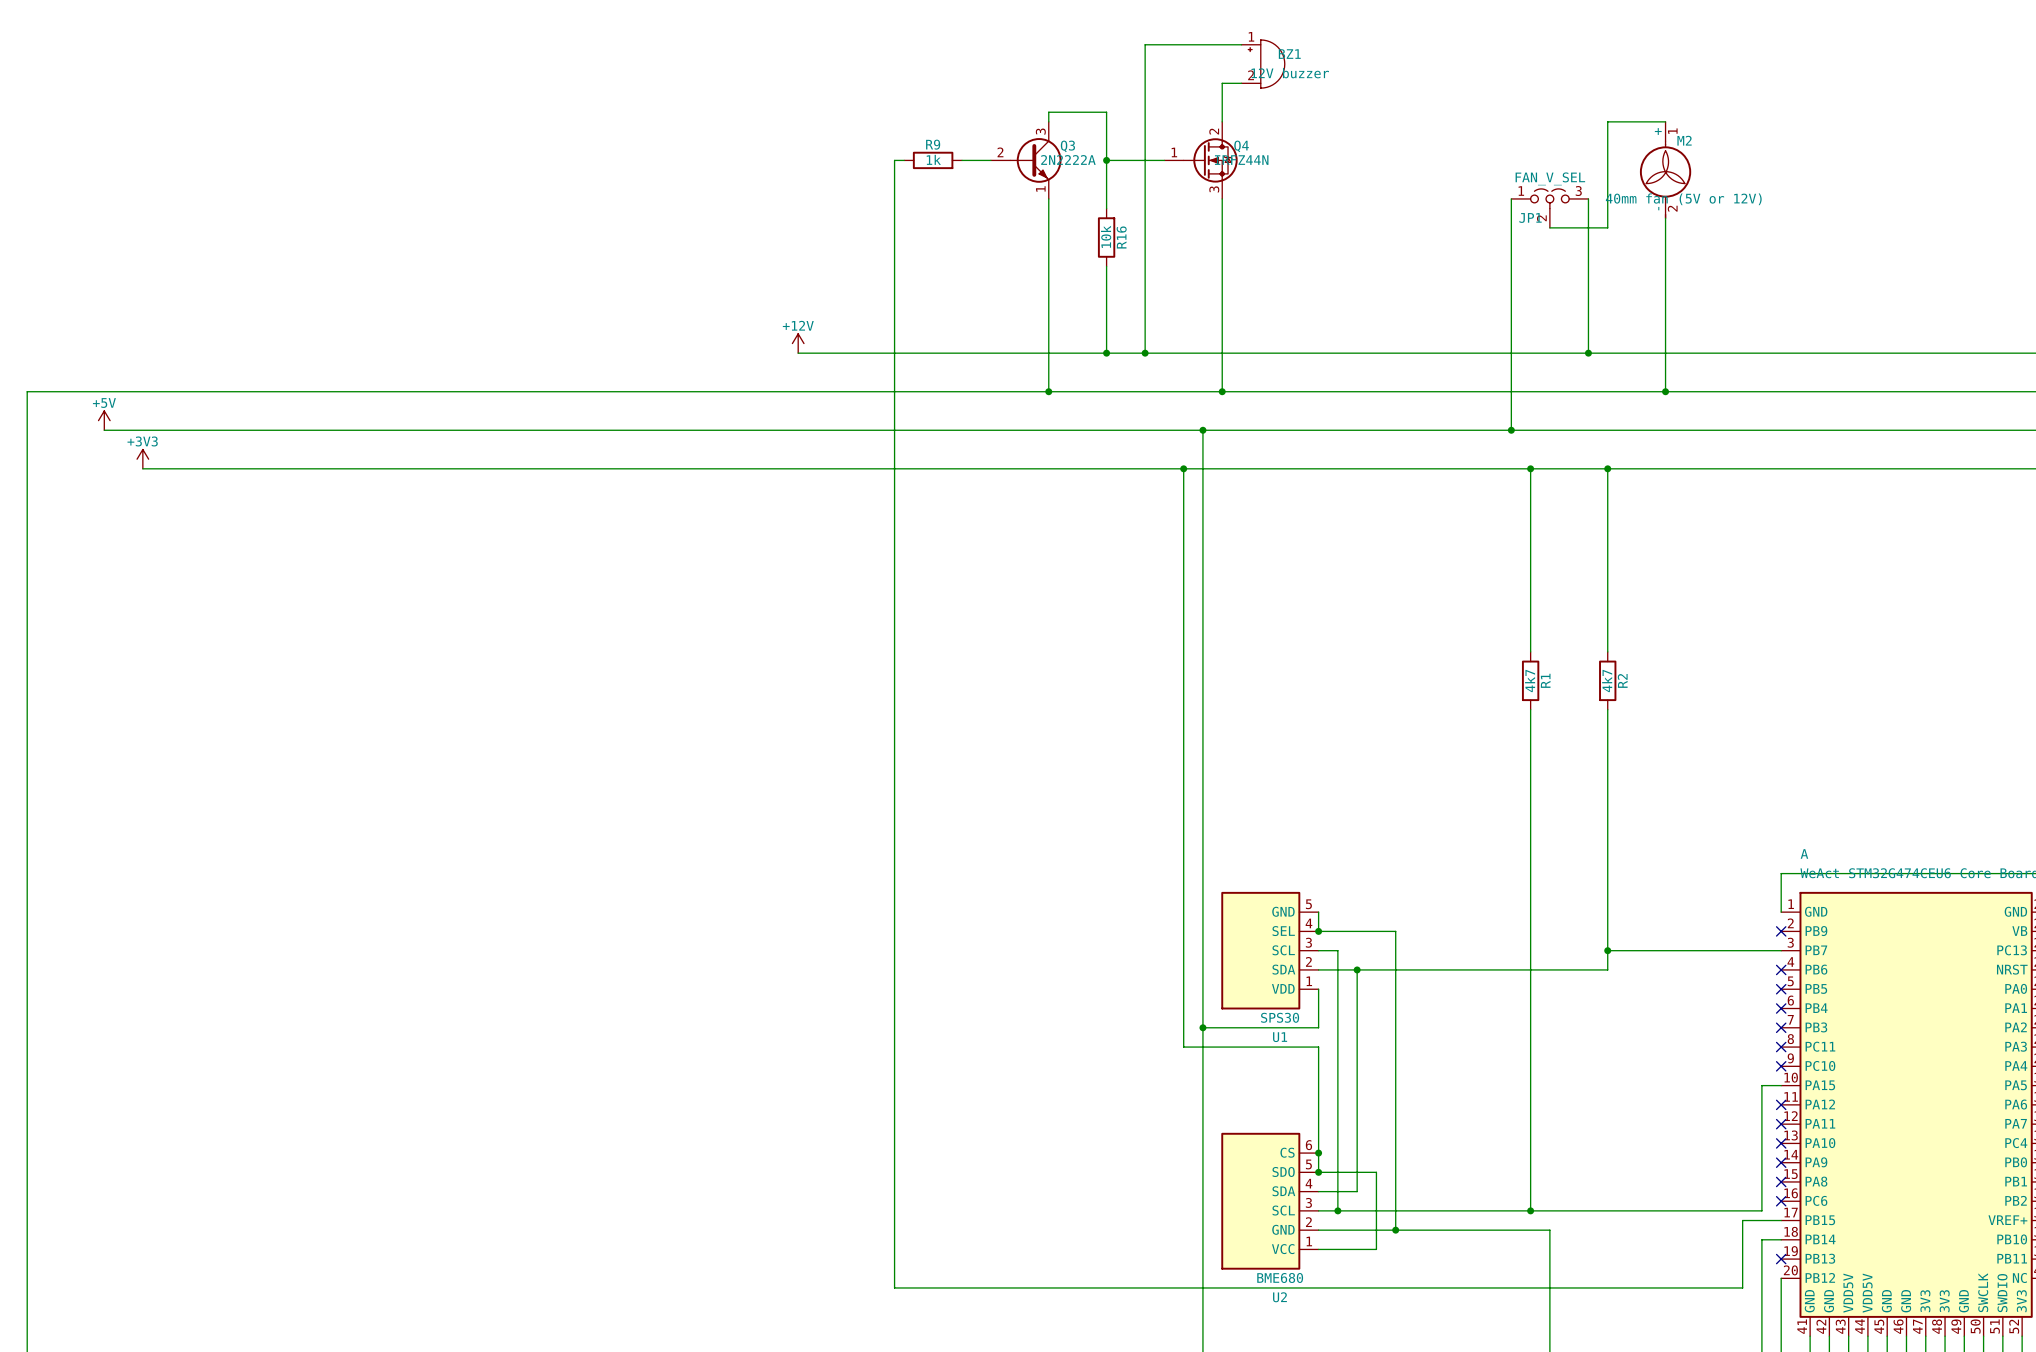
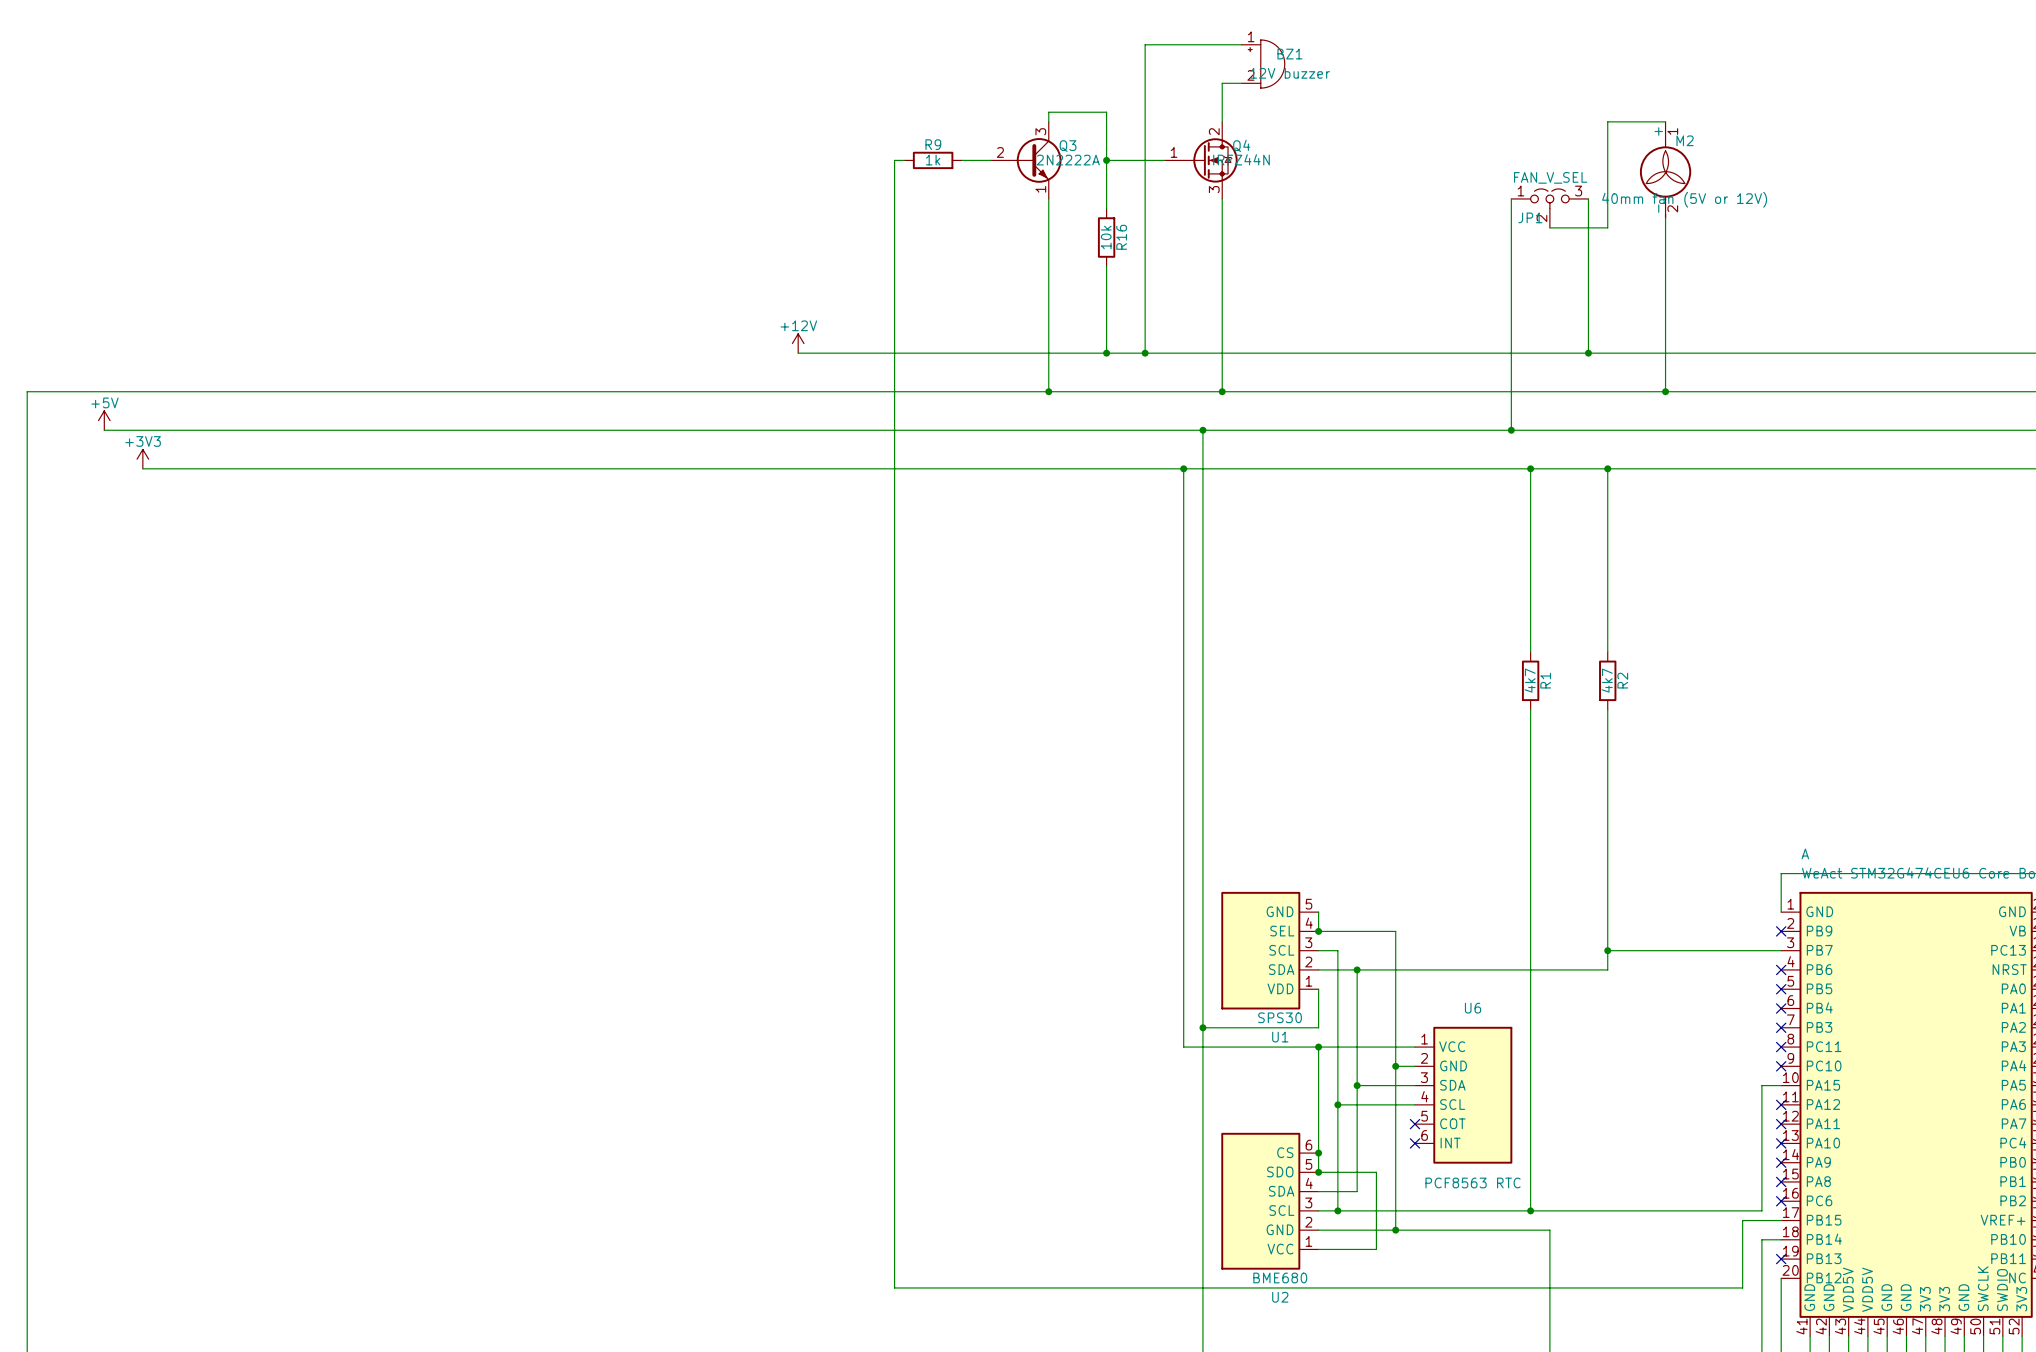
wire: none -> (1318, 1047) (1414, 1047)
junction: none -> (1318, 1047)
wire: none -> (1395, 1066) (1414, 1066)
junction: none -> (1395, 1066)
wire: none -> (1357, 1085) (1414, 1085)
junction: none -> (1357, 1085)
U6: none -> PCF8563 RTC (1463, 1095)
wire: none -> (1337, 1104) (1414, 1104)
junction: none -> (1337, 1104)
no-connect mark: none -> (1414, 1124)
no-connect mark: none -> (1414, 1143)

